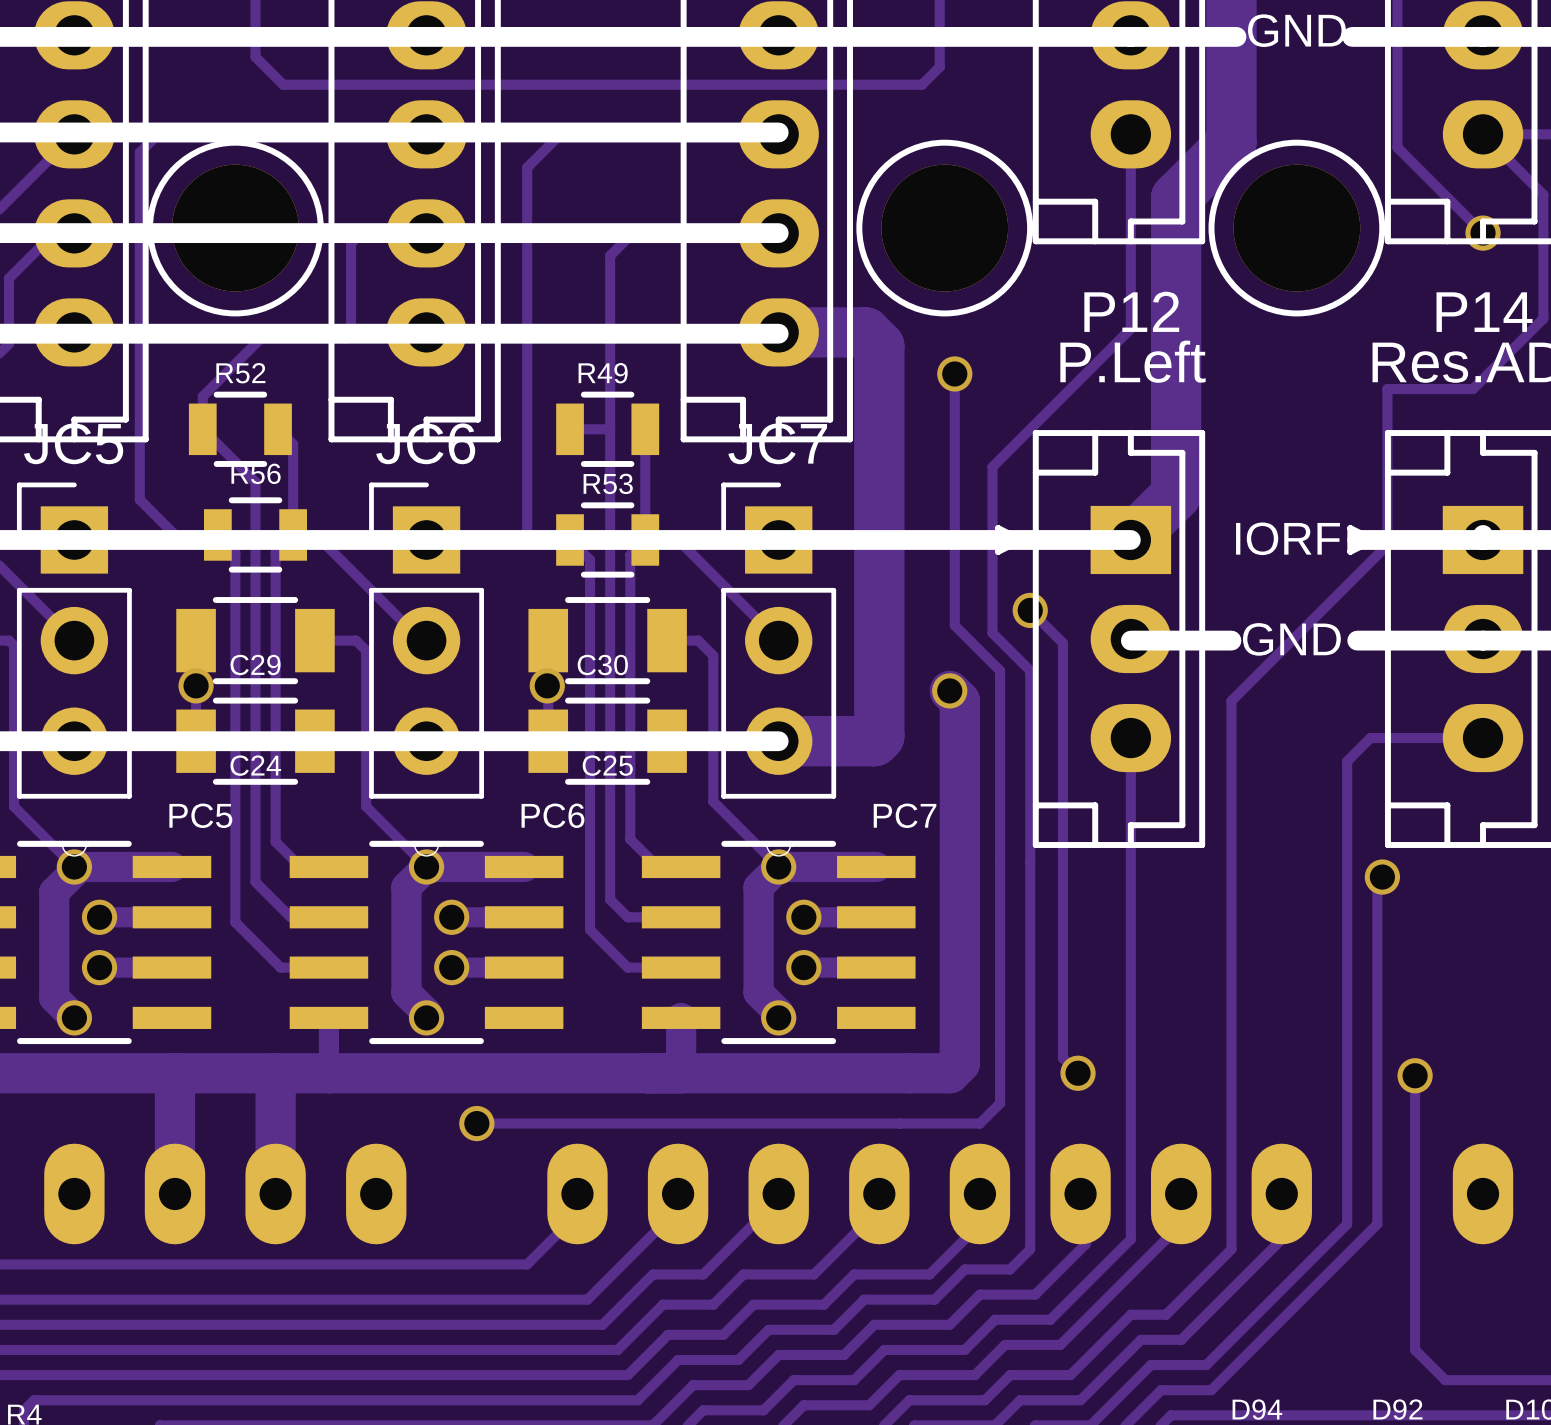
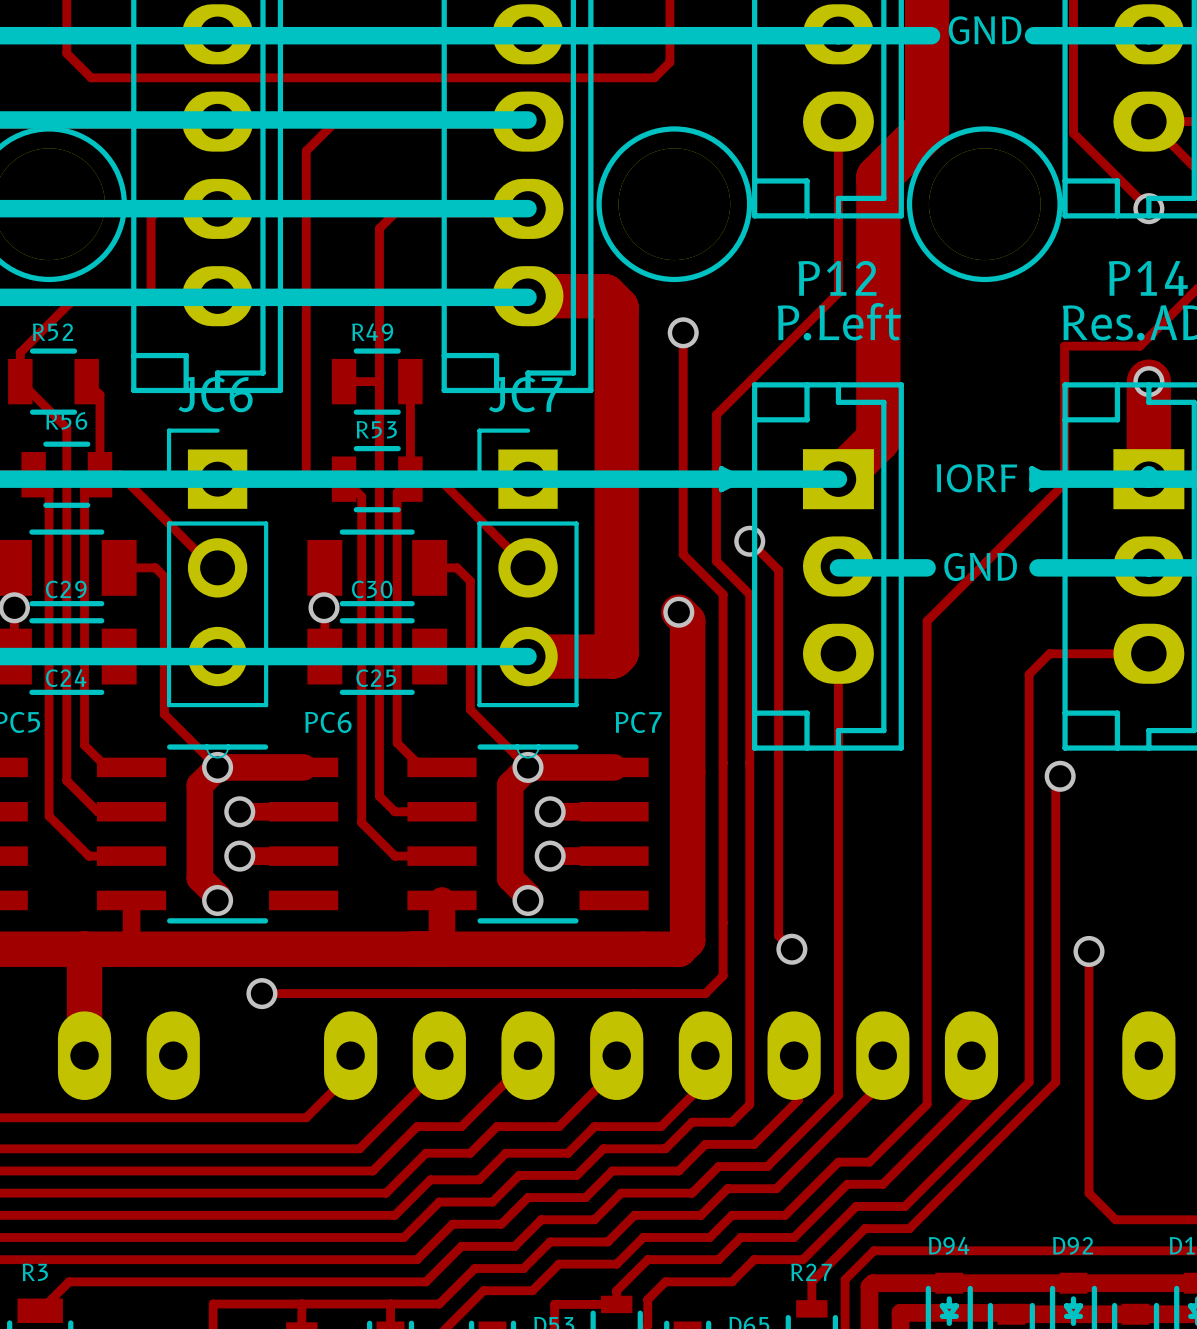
track: none -> (1148, 381) (1148, 479)
via: none -> (1148, 381)

